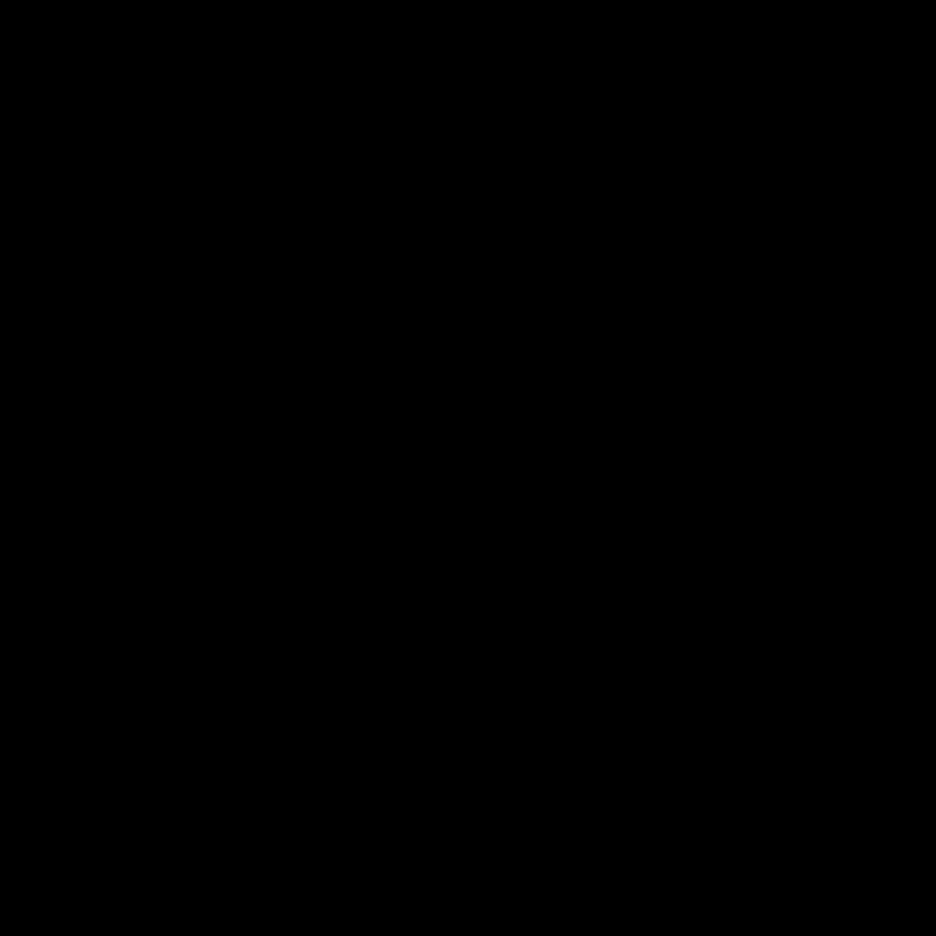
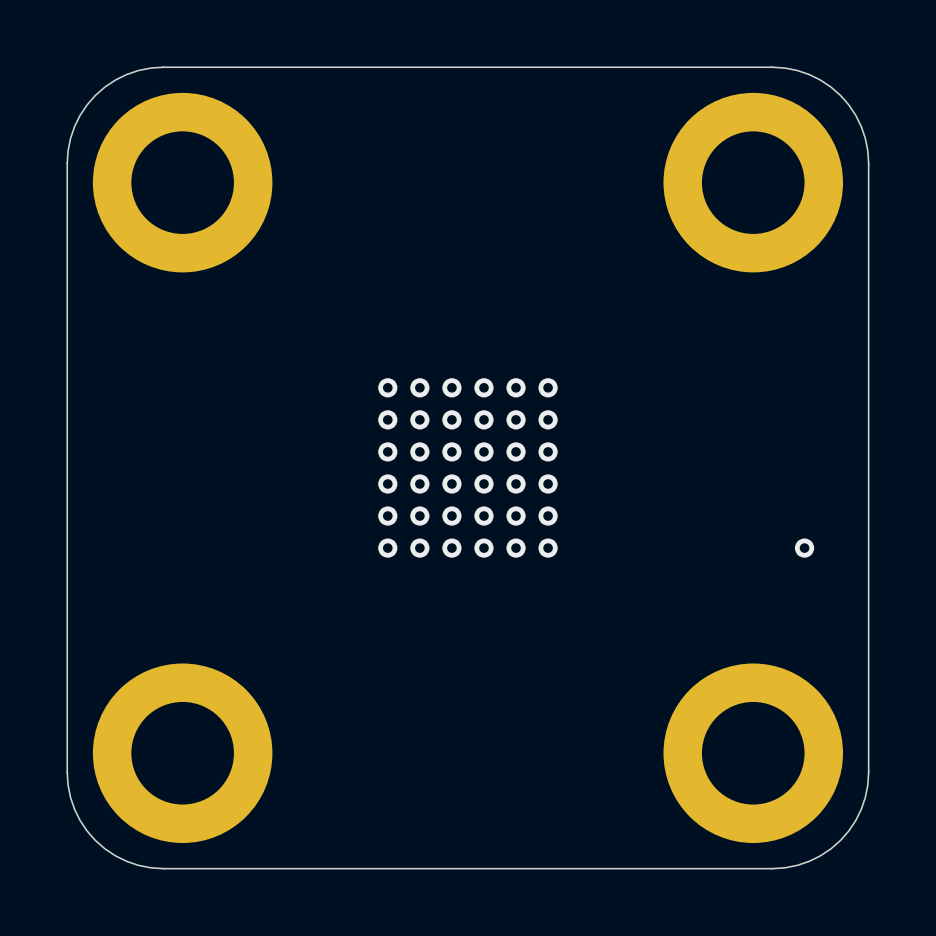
board edge: none -> (772, 67) (163, 67) (138, 70) (115, 80) (95, 95) (87, 104) (74, 126) (70, 138) (67, 163) (67, 772) (70, 797) (80, 820) (95, 840) (104, 848) (126, 861) (138, 865) (163, 868) (772, 868) (797, 865) (820, 855) (840, 840) (848, 831) (861, 809) (865, 797) (868, 772) (867, 150) (865, 138) (855, 115) (848, 104) (831, 87) (809, 74) (797, 70) (772, 67)
part: none -> (182, 182)
part: none -> (753, 182)
via: none -> (387, 387)
via: none -> (419, 387)
via: none -> (451, 387)
via: none -> (483, 387)
via: none -> (516, 387)
via: none -> (548, 387)
via: none -> (387, 419)
via: none -> (419, 419)
via: none -> (451, 419)
via: none -> (483, 419)
via: none -> (516, 419)
via: none -> (548, 419)
via: none -> (387, 451)
via: none -> (419, 451)
via: none -> (451, 451)
via: none -> (483, 451)
via: none -> (516, 451)
via: none -> (548, 451)
via: none -> (387, 483)
via: none -> (419, 483)
via: none -> (451, 483)
via: none -> (483, 483)
via: none -> (516, 483)
via: none -> (548, 483)
via: none -> (387, 516)
via: none -> (419, 516)
via: none -> (451, 516)
via: none -> (483, 516)
via: none -> (516, 516)
via: none -> (548, 516)
via: none -> (387, 548)
via: none -> (419, 548)
via: none -> (451, 548)
via: none -> (483, 548)
via: none -> (516, 548)
via: none -> (548, 548)
via: none -> (804, 548)
part: none -> (182, 753)
part: none -> (753, 753)

